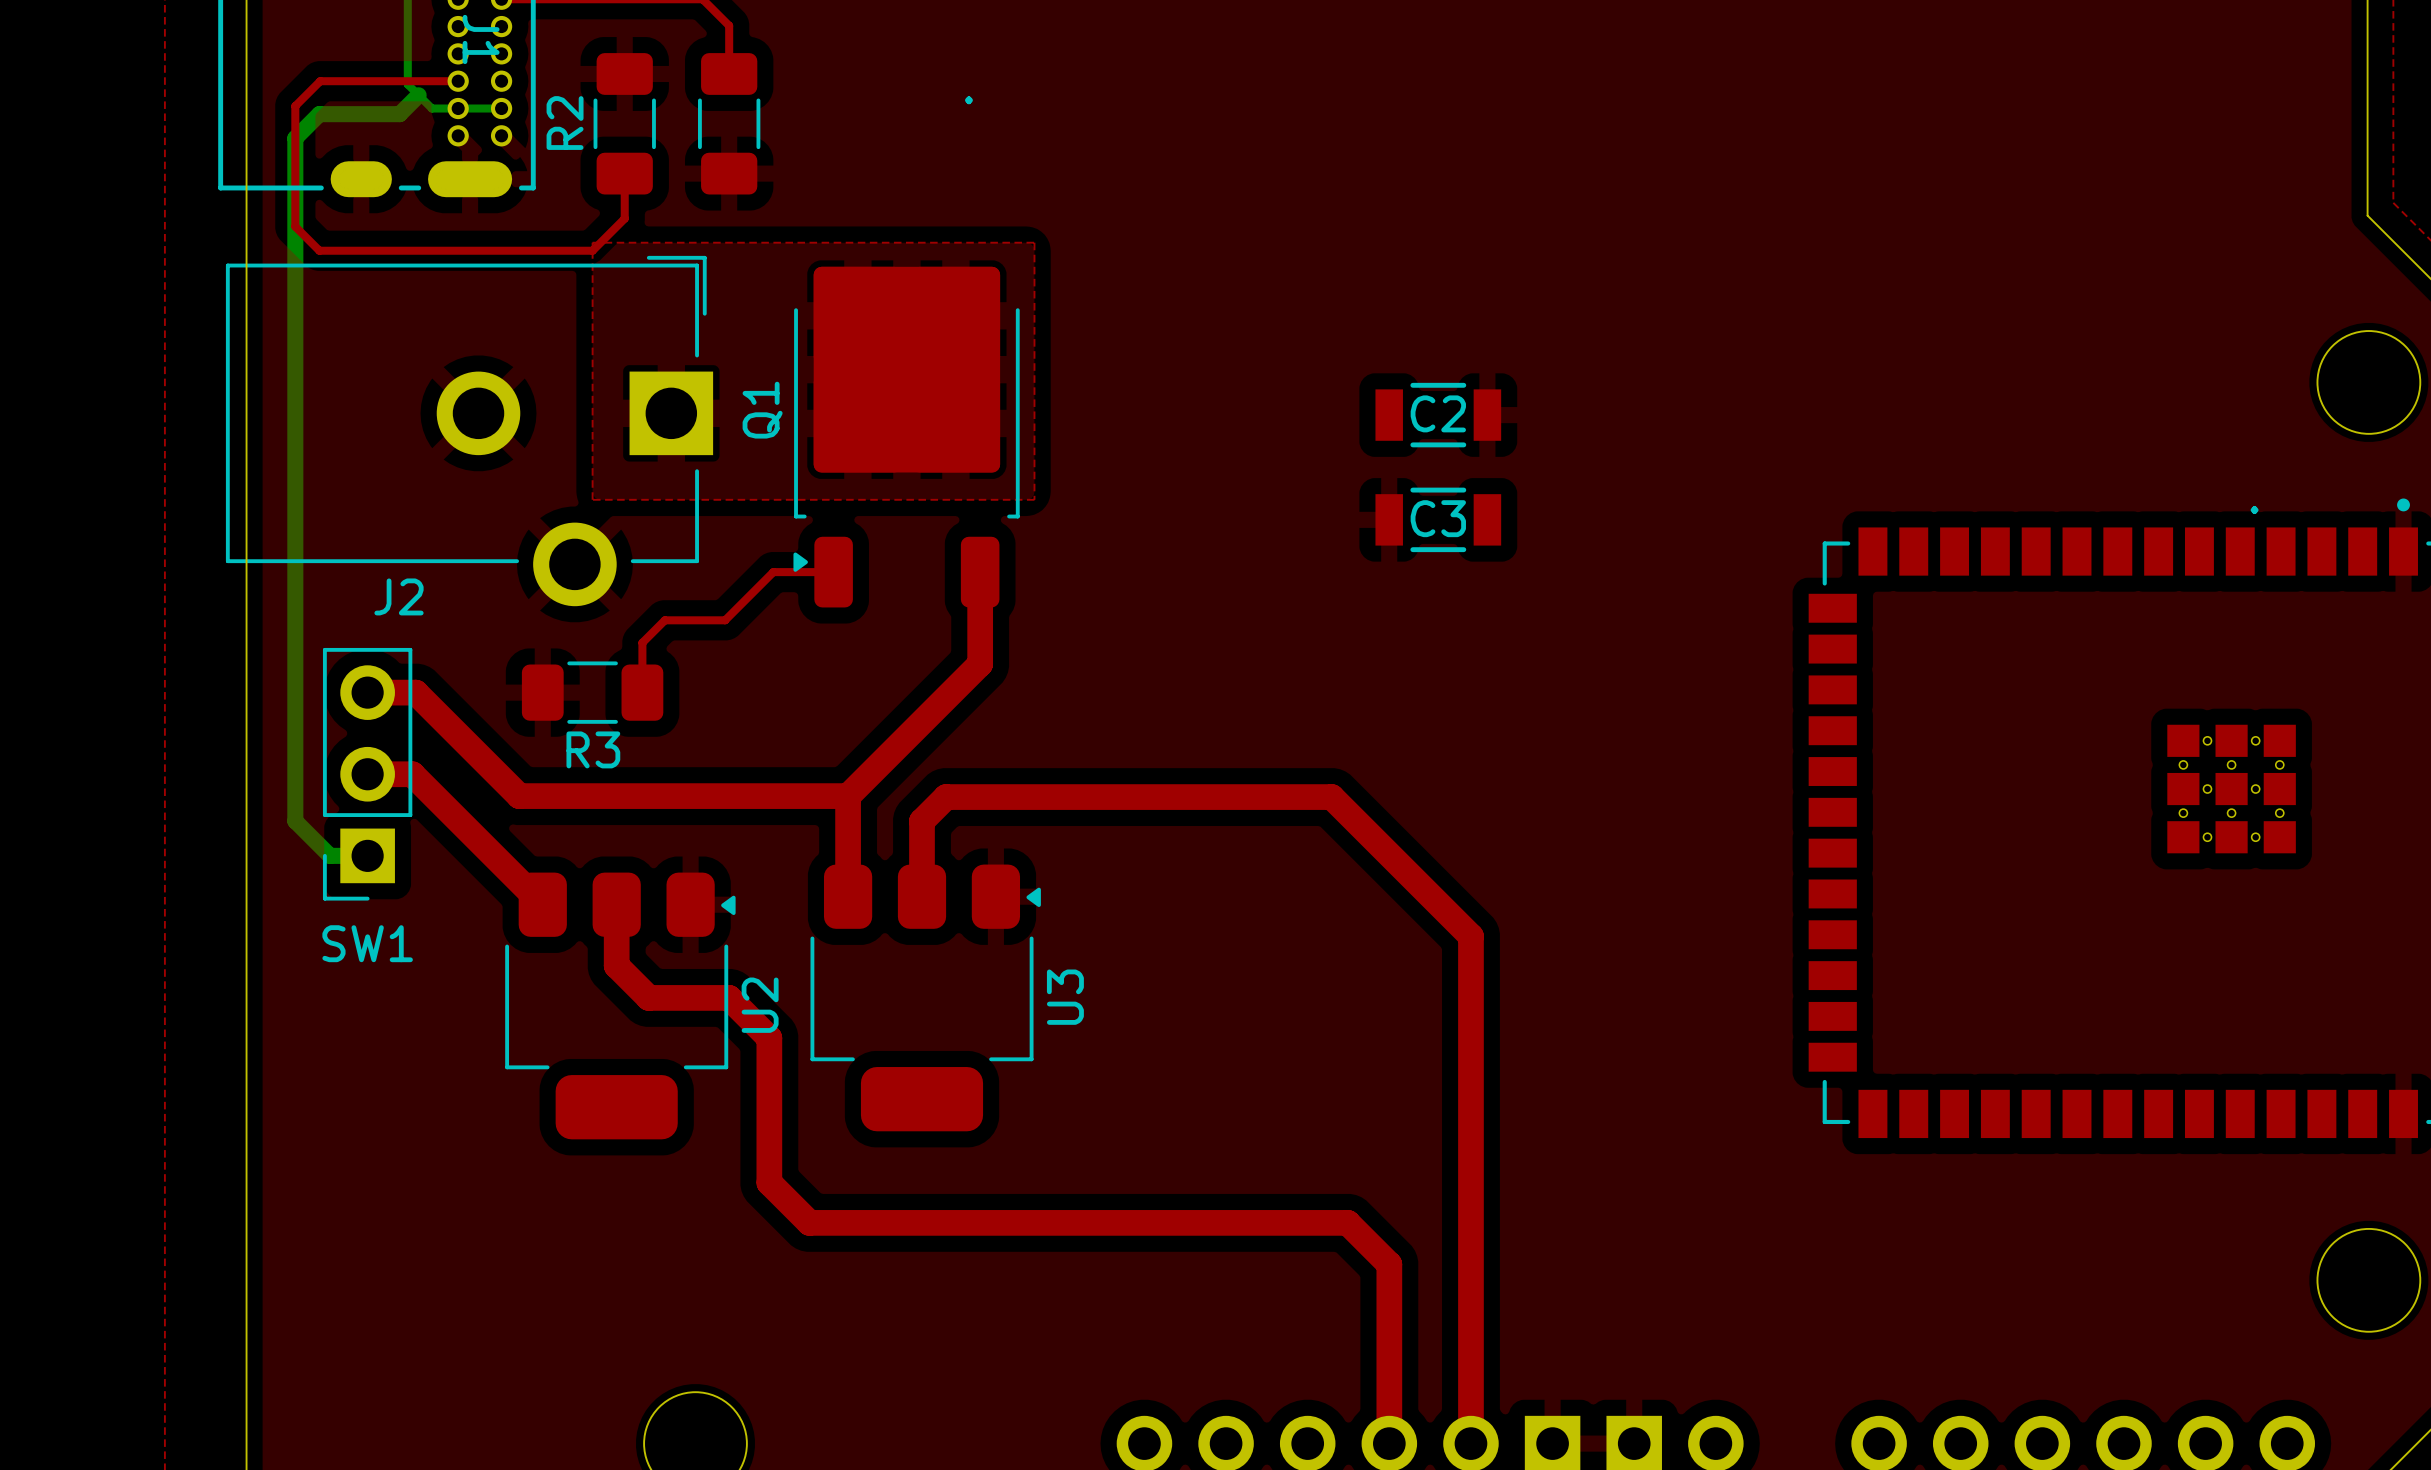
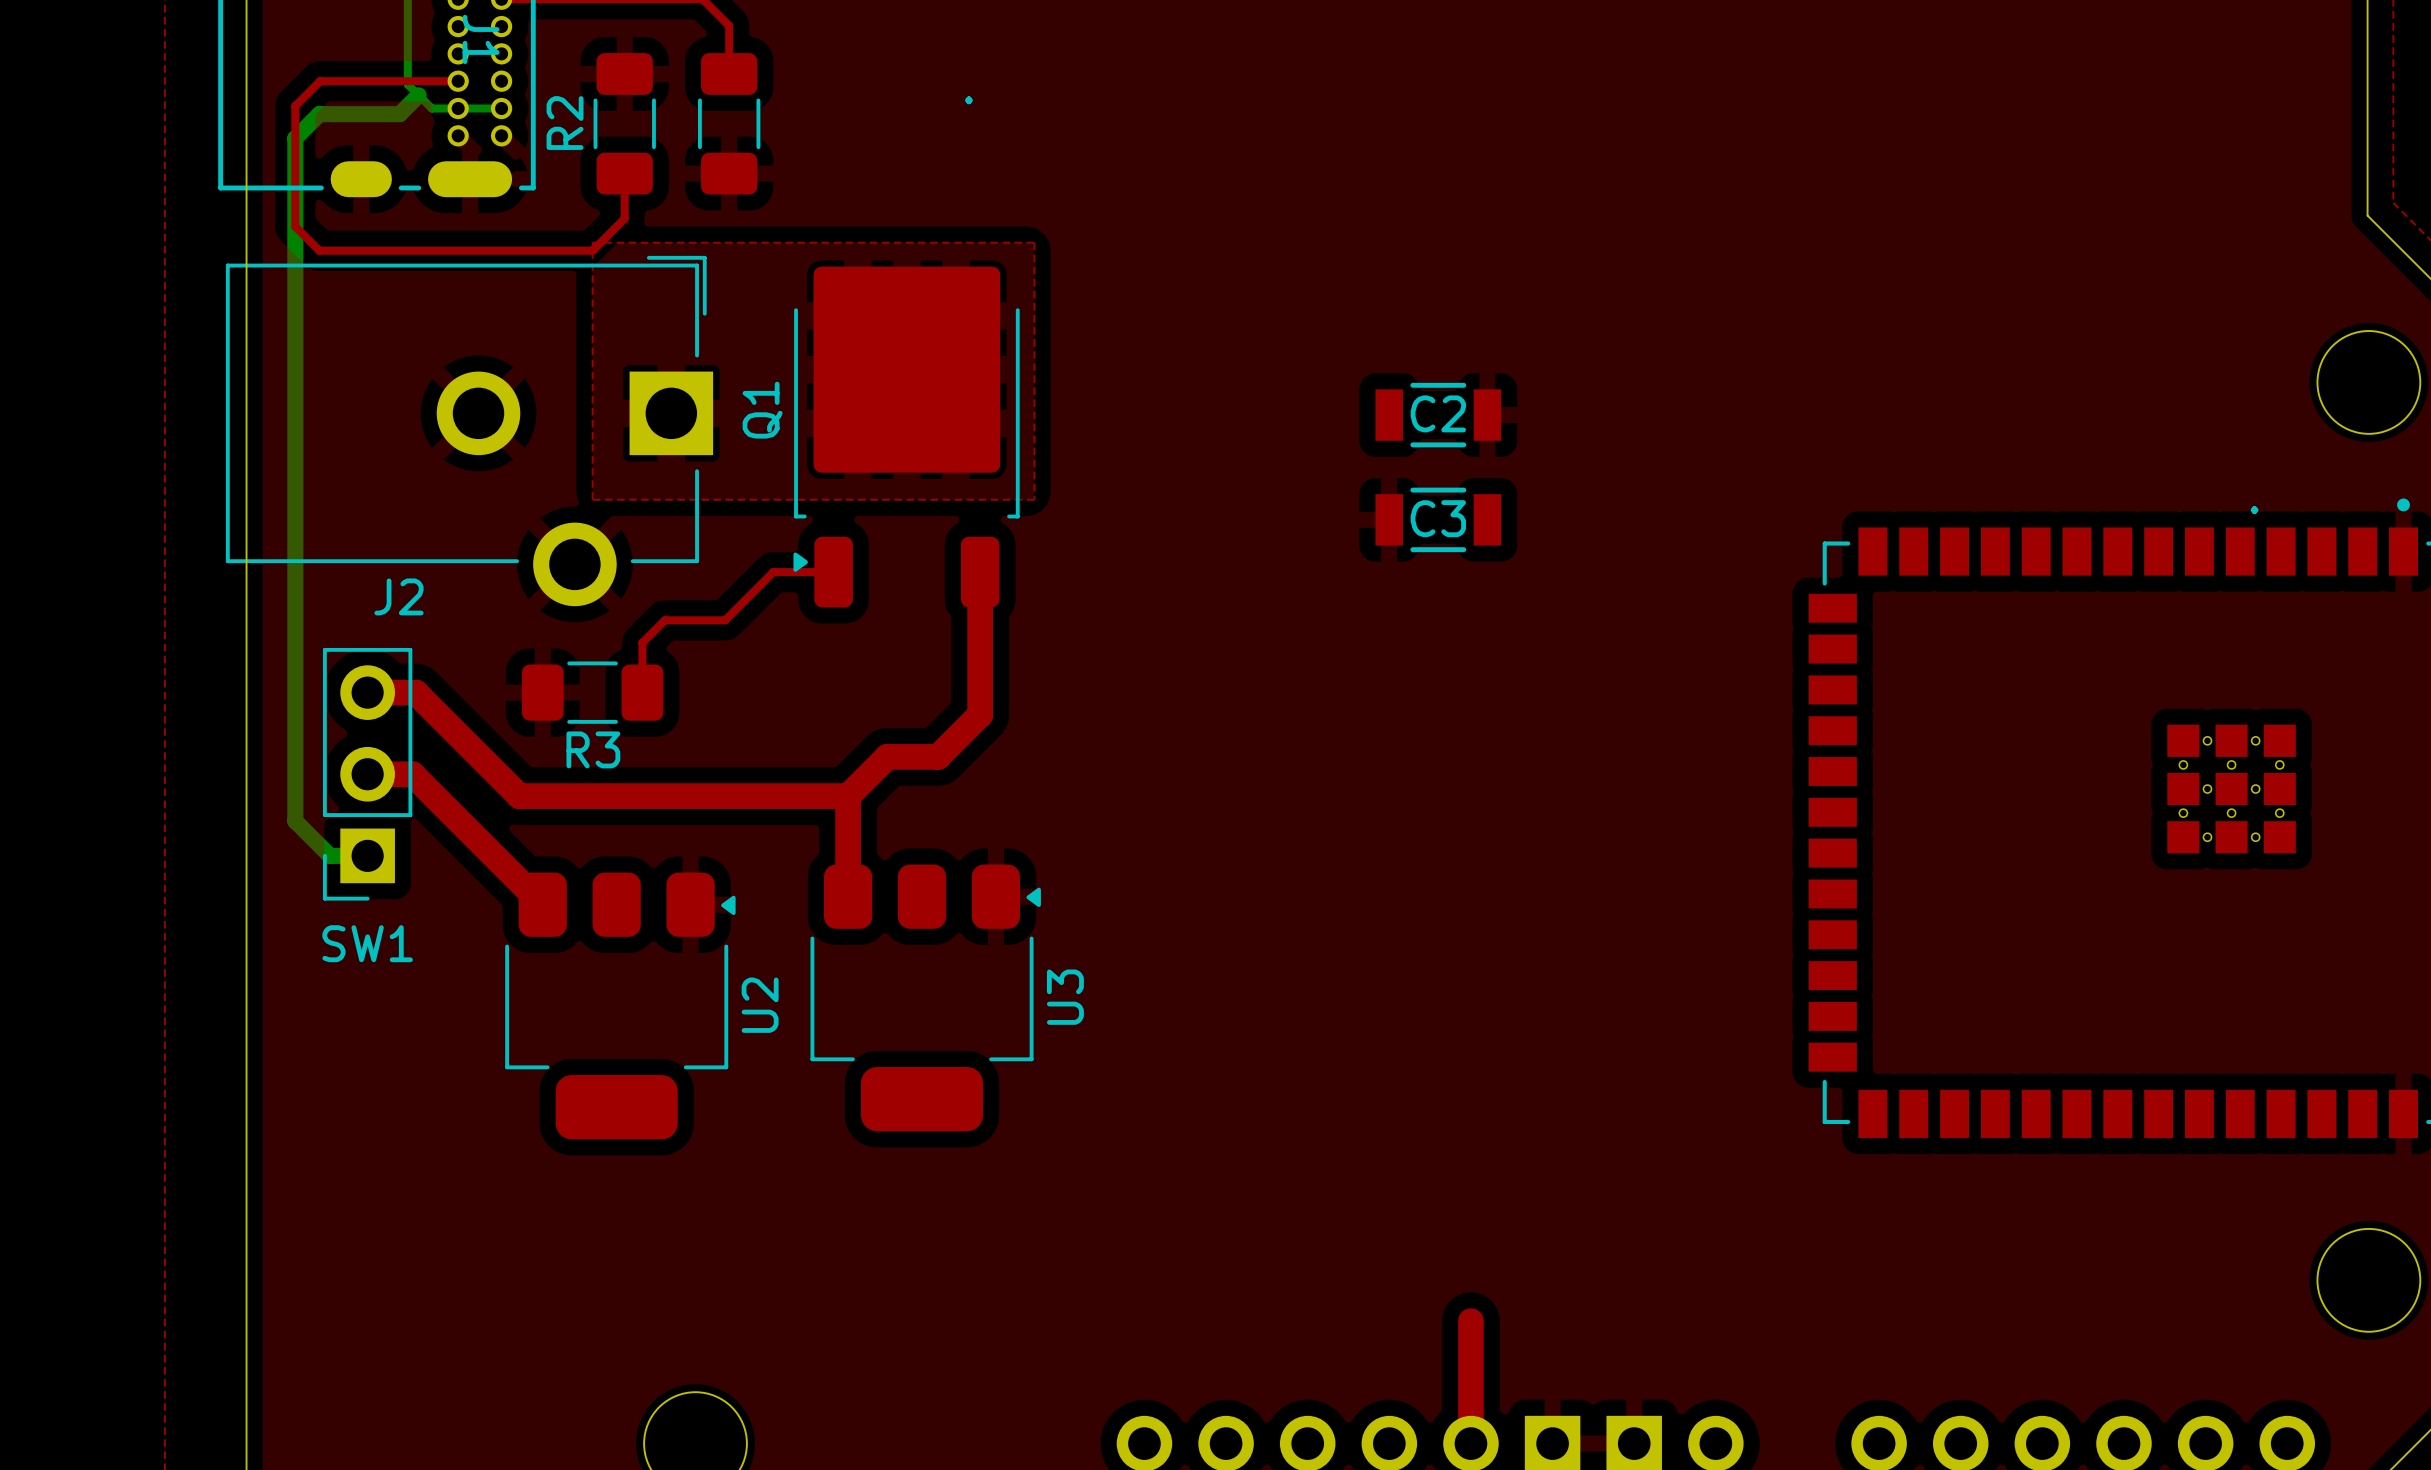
top track: (980, 664) (887, 756) -> (980, 664) (980, 714) (938, 756) (887, 756)
top track: (922, 896) (922, 821) (946, 797) (1331, 797) (1470, 936) (1470, 1321) -> none
top track: (616, 904) (616, 965) (648, 997) (729, 997) (769, 1038) (769, 1182) (809, 1222) (1347, 1222) (1389, 1264) (1389, 1443) -> none

